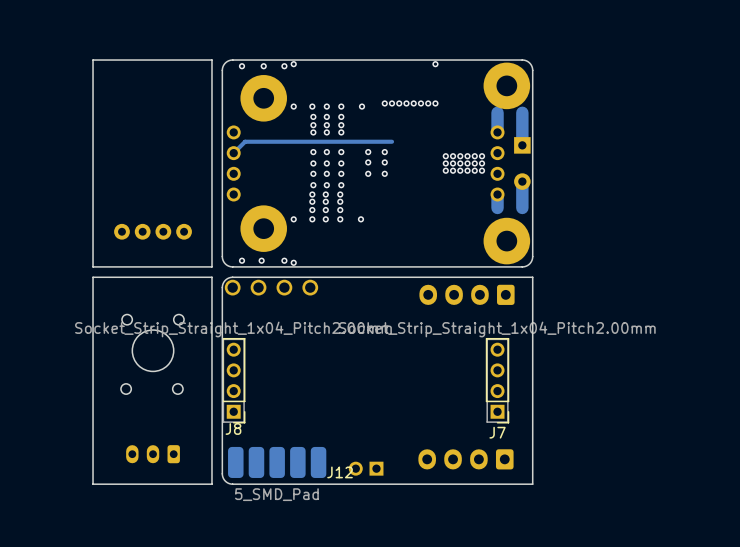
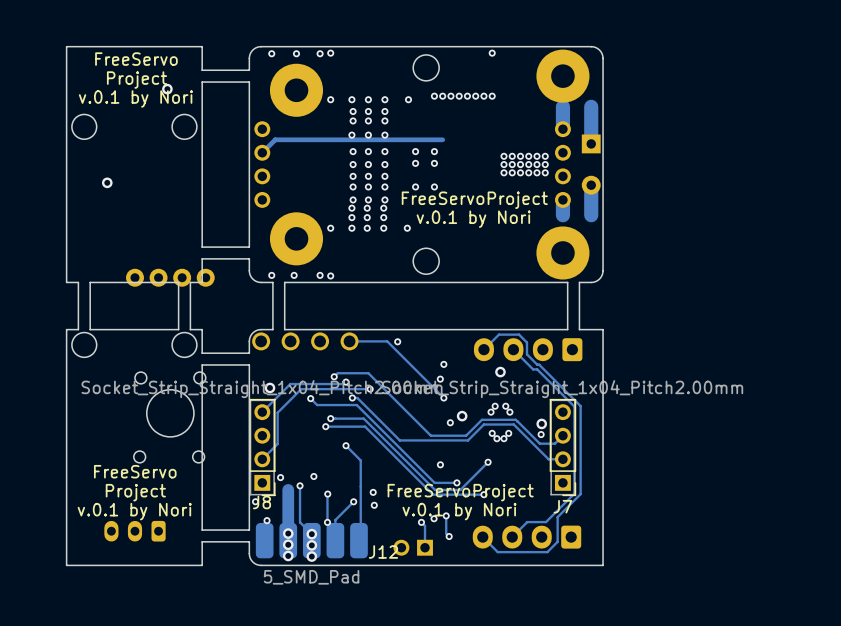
via: none -> (330, 53)
via: none -> (492, 53)
via: none -> (271, 53)
via: none -> (296, 53)
via: none -> (320, 53)
round board edge: none -> [412, 54, 440, 82]
text: none -> FreeServo (136, 59)
text: none -> Project (137, 80)
board edge: none -> (202, 82) (202, 247) (249, 247)
board edge: (211, 60) (211, 266) (93, 266) (93, 60) (180, 60) -> (237, 82) (249, 82) (249, 93)
via: (293, 64) -> none
via: (435, 64) -> none
via: none -> (167, 89)
via: (241, 66) -> none
via: (263, 66) -> none
via: (284, 66) -> none
board edge: (532, 70) (529, 63) (522, 60) (232, 60) (225, 63) (222, 70) -> (603, 93) (602, 55) (599, 50) (592, 46) (261, 46) (255, 48) (250, 52) (249, 70) (202, 70) (202, 46) (66, 46) (66, 282) (78, 282) (78, 329) (66, 329) (66, 565) (101, 565)
via: none -> (434, 96)
via: none -> (442, 96)
via: none -> (450, 96)
via: none -> (459, 96)
via: none -> (467, 96)
via: none -> (475, 96)
via: none -> (483, 96)
via: none -> (492, 96)
text: none -> v.0.1 by Nori (135, 99)
via: none -> (330, 99)
via: none -> (351, 99)
via: none -> (368, 99)
via: none -> (384, 99)
via: none -> (408, 99)
via: none -> (353, 111)
via: none -> (368, 111)
via: none -> (384, 111)
part position: (506, 85) -> (562, 76)
round board edge: none -> [71, 114, 97, 140]
round board edge: none -> [171, 114, 198, 140]
via: none -> (353, 120)
via: none -> (368, 120)
via: none -> (384, 120)
part position: (263, 98) -> (296, 90)
via: (384, 103) -> none
via: (392, 103) -> none
via: (399, 103) -> none
via: (406, 103) -> none
via: (413, 103) -> none
via: (420, 103) -> none
via: (428, 103) -> none
via: (435, 103) -> none
via: (293, 106) -> none
via: (362, 106) -> none
track: (497, 112) (497, 132) -> (562, 106) (562, 129)
track: (522, 114) (522, 145) -> (591, 106) (591, 142)
via: (313, 116) -> none
via: (326, 116) -> none
via: (341, 116) -> none
via: none -> (353, 151)
via: none -> (368, 151)
via: none -> (384, 151)
via: none -> (415, 151)
via: none -> (434, 151)
via: (313, 125) -> none
via: (326, 125) -> none
via: (341, 125) -> none
via: none -> (503, 156)
via: none -> (512, 156)
via: none -> (520, 156)
via: none -> (528, 156)
via: none -> (537, 156)
via: none -> (545, 156)
via: none -> (415, 163)
via: none -> (434, 163)
via: none -> (503, 164)
via: none -> (512, 164)
via: none -> (520, 164)
via: none -> (528, 164)
via: none -> (537, 164)
via: none -> (545, 164)
via: none -> (503, 172)
via: none -> (512, 172)
via: none -> (520, 172)
via: none -> (528, 172)
via: none -> (537, 172)
via: none -> (545, 172)
track: (392, 141) (245, 141) (233, 153) -> (442, 139) (275, 139) (262, 152)
via: none -> (353, 176)
via: none -> (368, 176)
via: none -> (384, 176)
via: none -> (107, 182)
via: (445, 156) -> none
via: (453, 156) -> none
via: (460, 156) -> none
via: (467, 156) -> none
via: (474, 156) -> none
via: (482, 156) -> none
via: (368, 162) -> none
via: (384, 162) -> none
part position: (233, 163) -> (262, 164)
text: none -> FreeServoProject (474, 200)
via: (445, 163) -> none
via: (453, 163) -> none
via: (460, 163) -> none
via: (467, 163) -> none
via: (474, 163) -> none
via: (482, 163) -> none
part position: (497, 163) -> (562, 164)
part position: (522, 163) -> (591, 164)
via: none -> (351, 208)
via: none -> (367, 208)
via: none -> (383, 208)
via: (445, 170) -> none
via: (453, 170) -> none
via: (460, 170) -> none
via: (467, 170) -> none
via: (474, 170) -> none
via: (482, 170) -> none
via: (313, 173) -> none
via: (326, 173) -> none
via: (341, 173) -> none
via: (368, 173) -> none
via: (384, 173) -> none
via: none -> (351, 217)
via: none -> (367, 217)
via: none -> (383, 217)
text: none -> v.0.1 by Nori (473, 219)
track: (522, 181) (522, 207) -> (591, 185) (591, 215)
via: (313, 185) -> none
via: (326, 185) -> none
via: (341, 185) -> none
via: none -> (330, 228)
via: none -> (351, 228)
via: none -> (367, 228)
via: none -> (383, 228)
via: none -> (407, 228)
via: (312, 194) -> none
via: (325, 194) -> none
via: (340, 194) -> none
track: (497, 194) (497, 207) -> (562, 199) (562, 215)
via: (312, 201) -> none
via: (325, 201) -> none
via: (340, 201) -> none
board edge: (222, 204) (222, 215) -> (190, 329) (190, 282) (202, 282) (202, 258) (249, 258)
round board edge: none -> [412, 247, 440, 275]
via: (312, 210) -> none
via: (325, 210) -> none
via: (340, 210) -> none
via: (293, 219) -> none
via: (312, 219) -> none
via: (325, 219) -> none
via: (340, 219) -> none
via: (360, 219) -> none
board edge: (532, 225) (532, 259) (528, 264) (522, 266) (231, 266) (225, 263) (222, 259) (222, 225) -> none
part position: (263, 228) -> (296, 238)
via: none -> (271, 275)
via: none -> (294, 275)
via: none -> (320, 275)
via: none -> (330, 275)
part position: (506, 241) -> (562, 252)
via: (241, 260) -> none
via: (261, 260) -> none
via: (284, 260) -> none
via: (293, 262) -> none
board edge: (93, 277) (93, 484) -> none
board edge: (170, 277) (160, 277) -> (101, 329) (90, 329) (90, 282) (178, 282) (178, 329)
board edge: (180, 277) (211, 277) (211, 484) (180, 484) -> none
board edge: (253, 277) (243, 277) -> (249, 270) (250, 276) (255, 280) (272, 282) (272, 329)
board edge: none -> (567, 329) (567, 282) (284, 282) (284, 329)
board edge: (512, 277) (501, 277) -> (579, 329) (579, 282) (597, 280) (601, 276) (603, 270)
round board edge: none -> [71, 332, 97, 358]
round board edge: none -> [171, 332, 198, 358]
track: none -> (349, 341) (387, 341) (443, 398)
via: none -> (397, 341)
track: none -> (483, 349) (498, 334) (519, 334) (526, 342) (526, 354) (580, 406) (580, 494) (557, 517) (557, 541) (547, 552) (497, 552) (482, 537)
track: none -> (513, 349) (533, 369) (537, 369) (574, 406) (574, 493) (546, 522) (527, 522) (512, 537)
board edge: (222, 297) (222, 308) -> (249, 353) (202, 353) (202, 329)
via: none -> (443, 364)
board edge: none -> (249, 364) (202, 364) (202, 530) (249, 530)
via: none -> (500, 372)
track: none -> (334, 376) (337, 373) (368, 373) (430, 435) (466, 435) (482, 419) (515, 419) (517, 421)
via: none -> (334, 376)
via: none -> (440, 379)
track: none -> (346, 382) (344, 384) (290, 384) (262, 412)
via: none -> (346, 382)
via: none -> (269, 387)
track: none -> (370, 389) (301, 389) (277, 412) (277, 443) (262, 459)
via: none -> (370, 389)
track: none -> (310, 398) (317, 405) (356, 405) (434, 482) (456, 482)
via: none -> (310, 398)
track: none -> (352, 397) (357, 397) (399, 440) (468, 440) (483, 424) (513, 424) (548, 459) (562, 459)
via: none -> (352, 397)
via: none -> (443, 398)
via: none -> (495, 406)
via: none -> (505, 406)
via: none -> (491, 412)
via: none -> (509, 412)
via: none -> (462, 416)
track: none -> (330, 418) (363, 418) (435, 489) (460, 489) (488, 462)
via: none -> (330, 418)
track: none -> (517, 421) (539, 443) (554, 443) (562, 435)
via: none -> (450, 422)
via: none -> (541, 423)
track: none -> (325, 426) (365, 426) (433, 494) (483, 494)
via: none -> (325, 426)
via: none -> (492, 433)
via: none -> (508, 433)
via: none -> (541, 434)
via: none -> (496, 438)
via: none -> (503, 438)
track: none -> (346, 445) (360, 460) (360, 543) (358, 545)
via: none -> (346, 445)
via: none -> (488, 462)
via: none -> (440, 464)
text: none -> FreeServo (135, 471)
via: none -> (313, 476)
via: none -> (280, 477)
via: none -> (456, 482)
track: none -> (300, 485) (300, 522) (311, 534)
via: none -> (300, 485)
track: none -> (288, 489) (288, 545)
text: none -> Project (135, 492)
via: none -> (373, 492)
text: none -> FreeServoProject (460, 492)
track: none -> (327, 494) (327, 522)
via: none -> (327, 494)
via: none -> (483, 494)
via: none -> (255, 501)
track: none -> (353, 501) (335, 520) (335, 545)
via: none -> (353, 501)
via: none -> (374, 505)
text: none -> v.0.1 by Nori (459, 511)
text: none -> v.0.1 by Nori (134, 511)
track: none -> (446, 515) (446, 533) (449, 536)
via: none -> (446, 515)
via: none -> (434, 518)
via: none -> (267, 520)
via: none -> (327, 522)
track: none -> (421, 522) (425, 525) (425, 547)
via: none -> (421, 522)
board edge: (222, 453) (222, 463) -> (202, 565) (202, 541) (249, 541)
part position: (153, 454) -> (134, 531)
via: none -> (288, 533)
via: none -> (311, 534)
via: none -> (449, 536)
via: none -> (288, 544)
via: none -> (311, 545)
via: none -> (288, 555)
via: none -> (311, 556)

